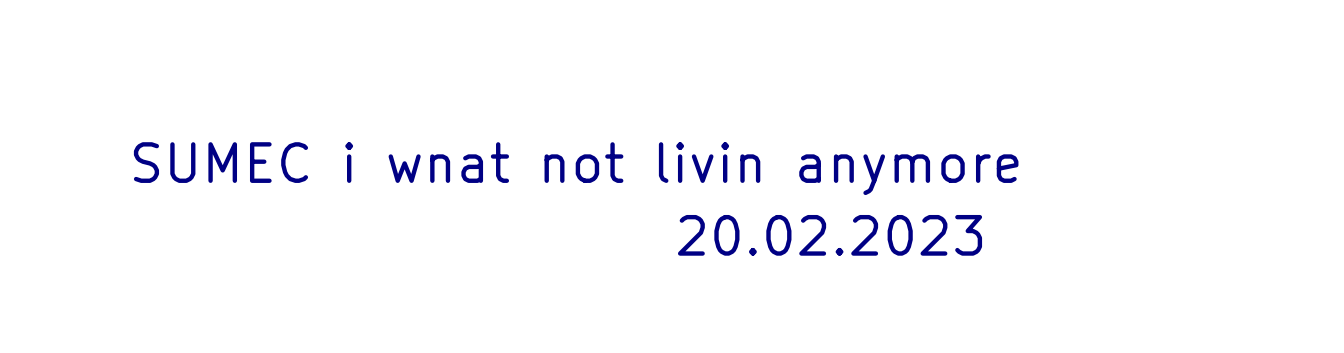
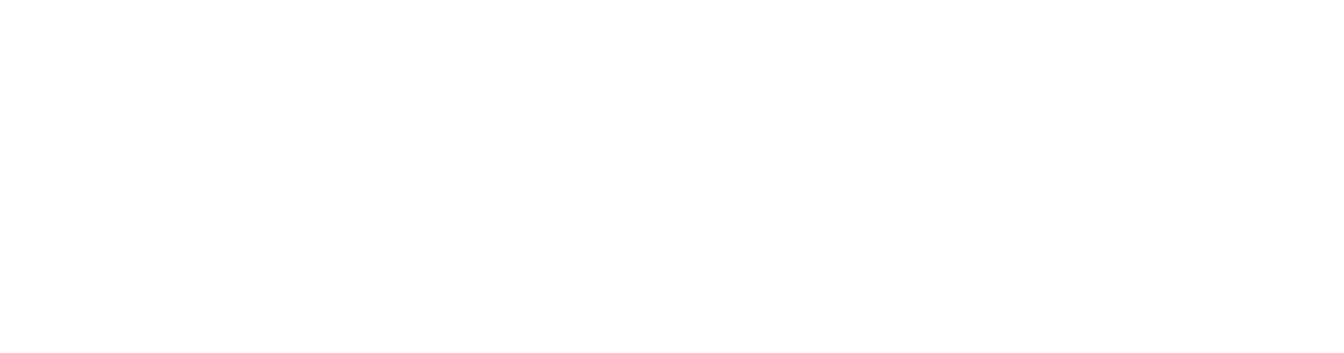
text: SUMEC i wnat not livin anymore (576, 168) -> none
text: 20.02.2023 (830, 235) -> none

